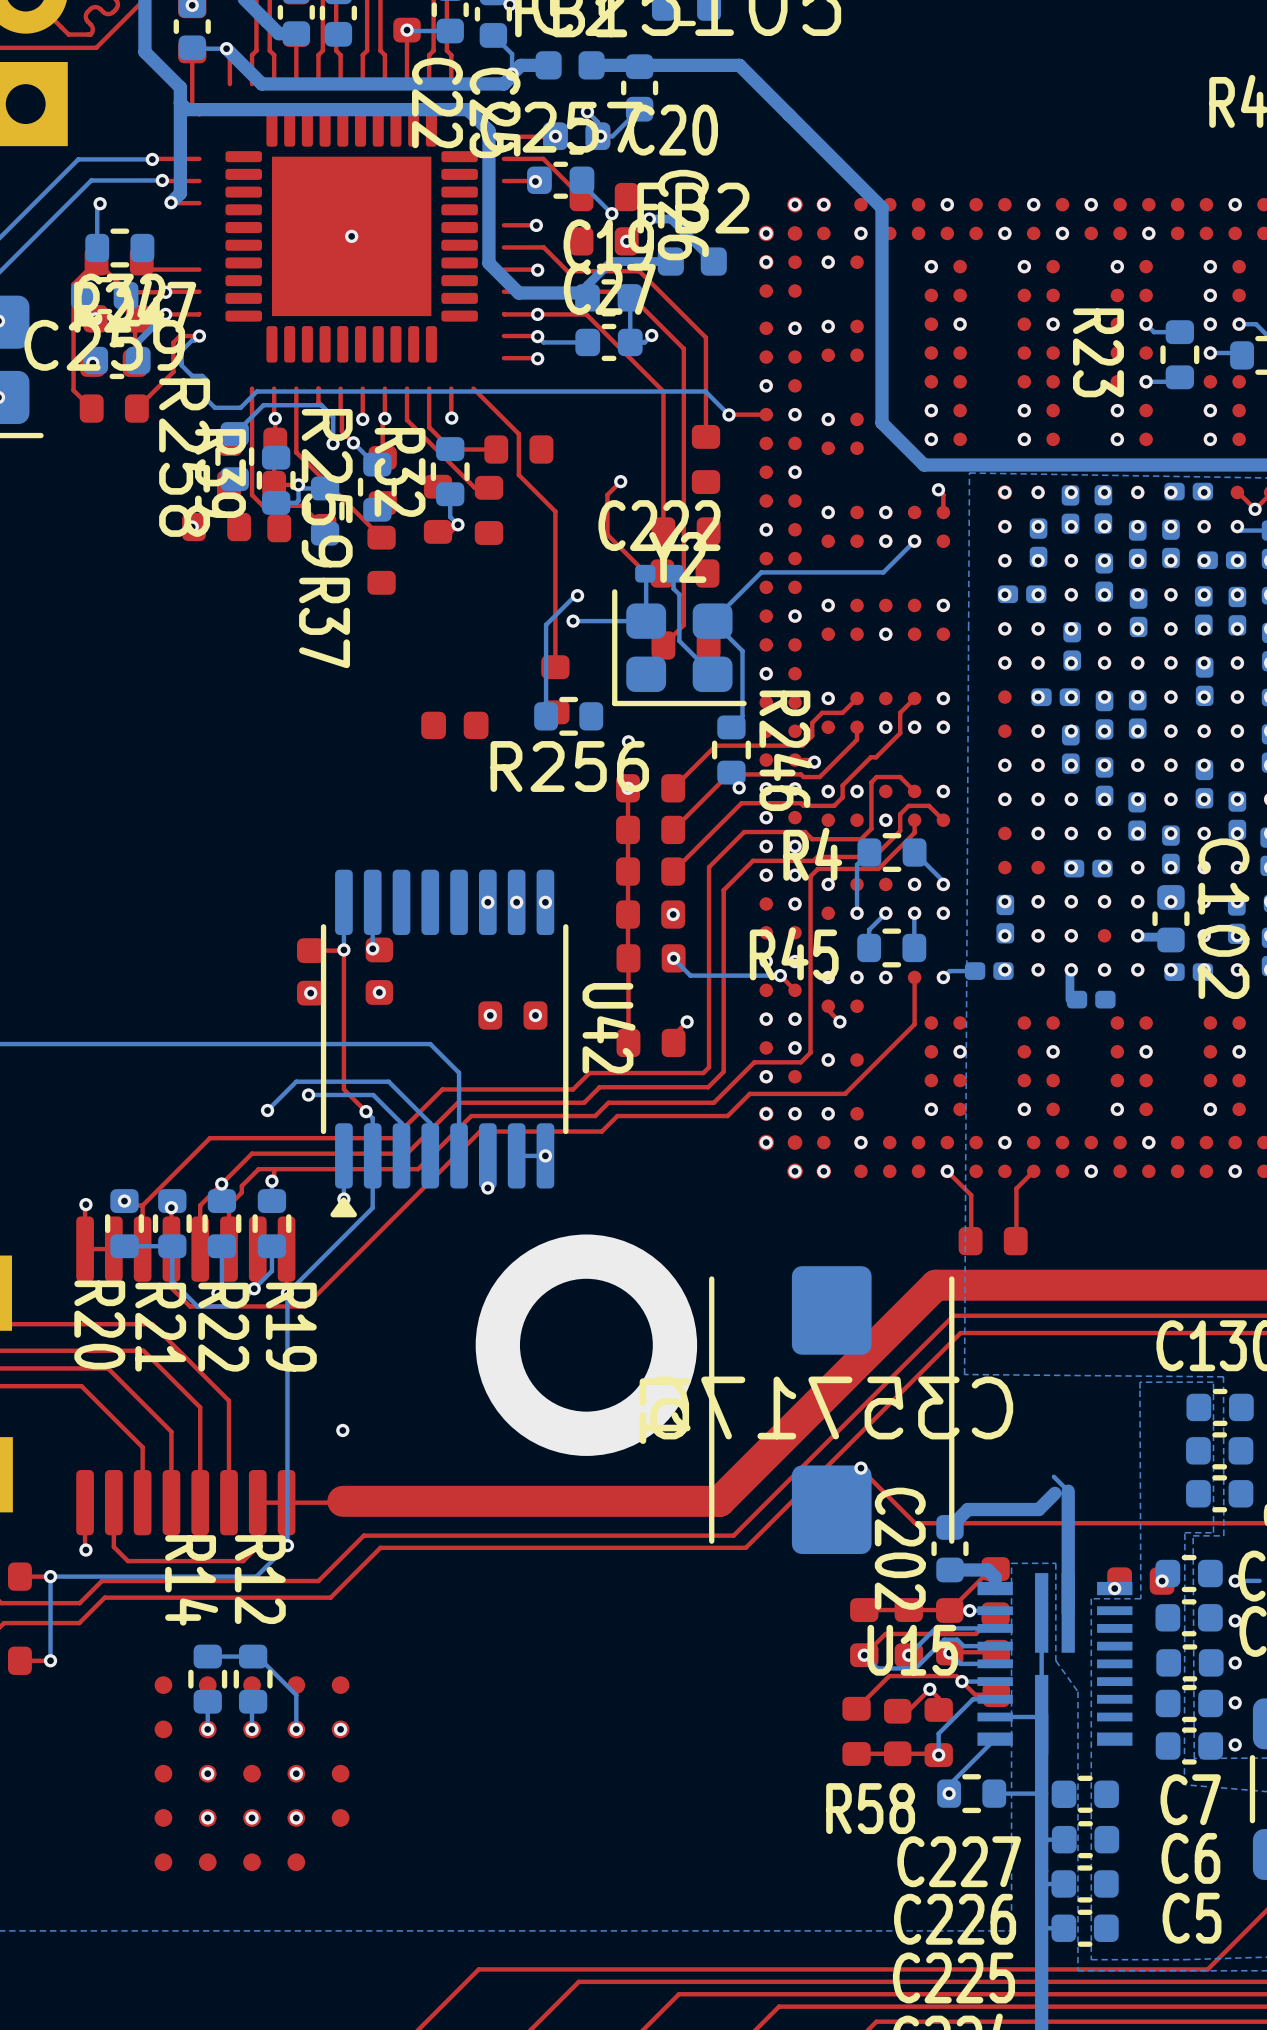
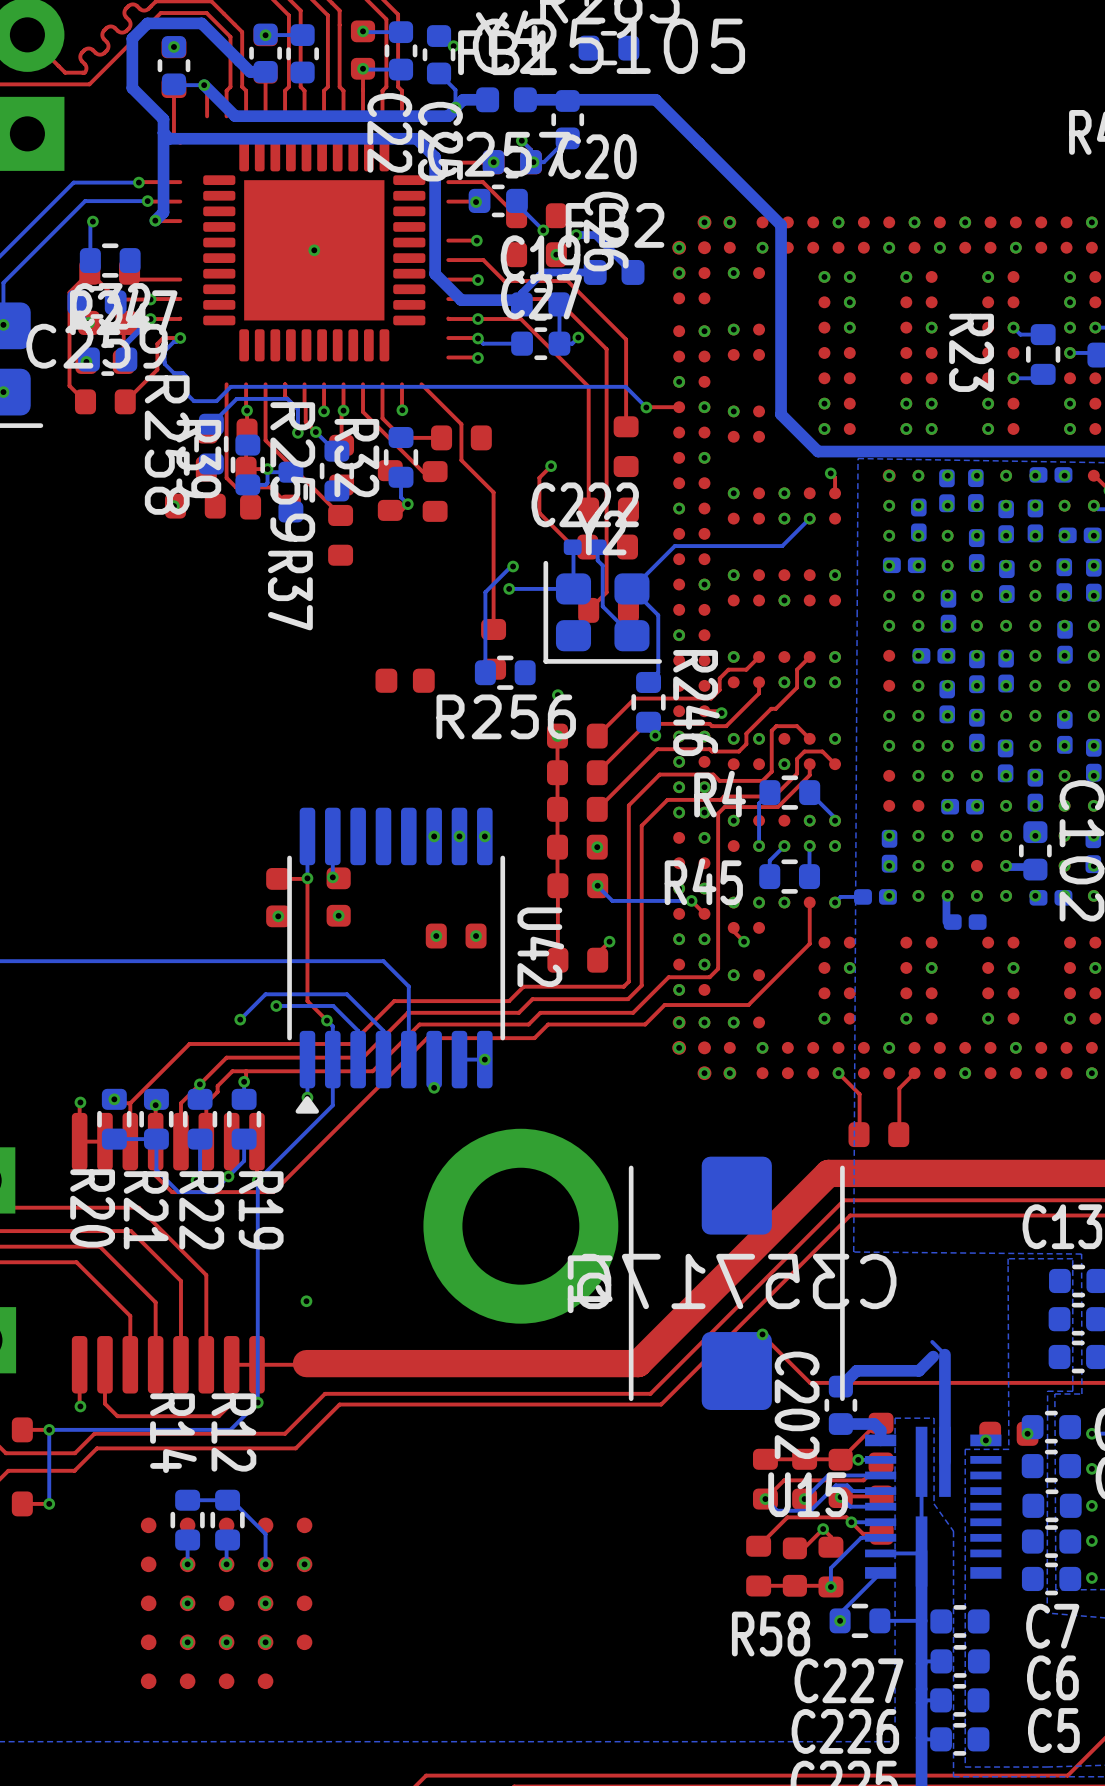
via: none -> (849, 276)
via: none -> (849, 302)
via: none -> (931, 403)
via: none -> (931, 428)

